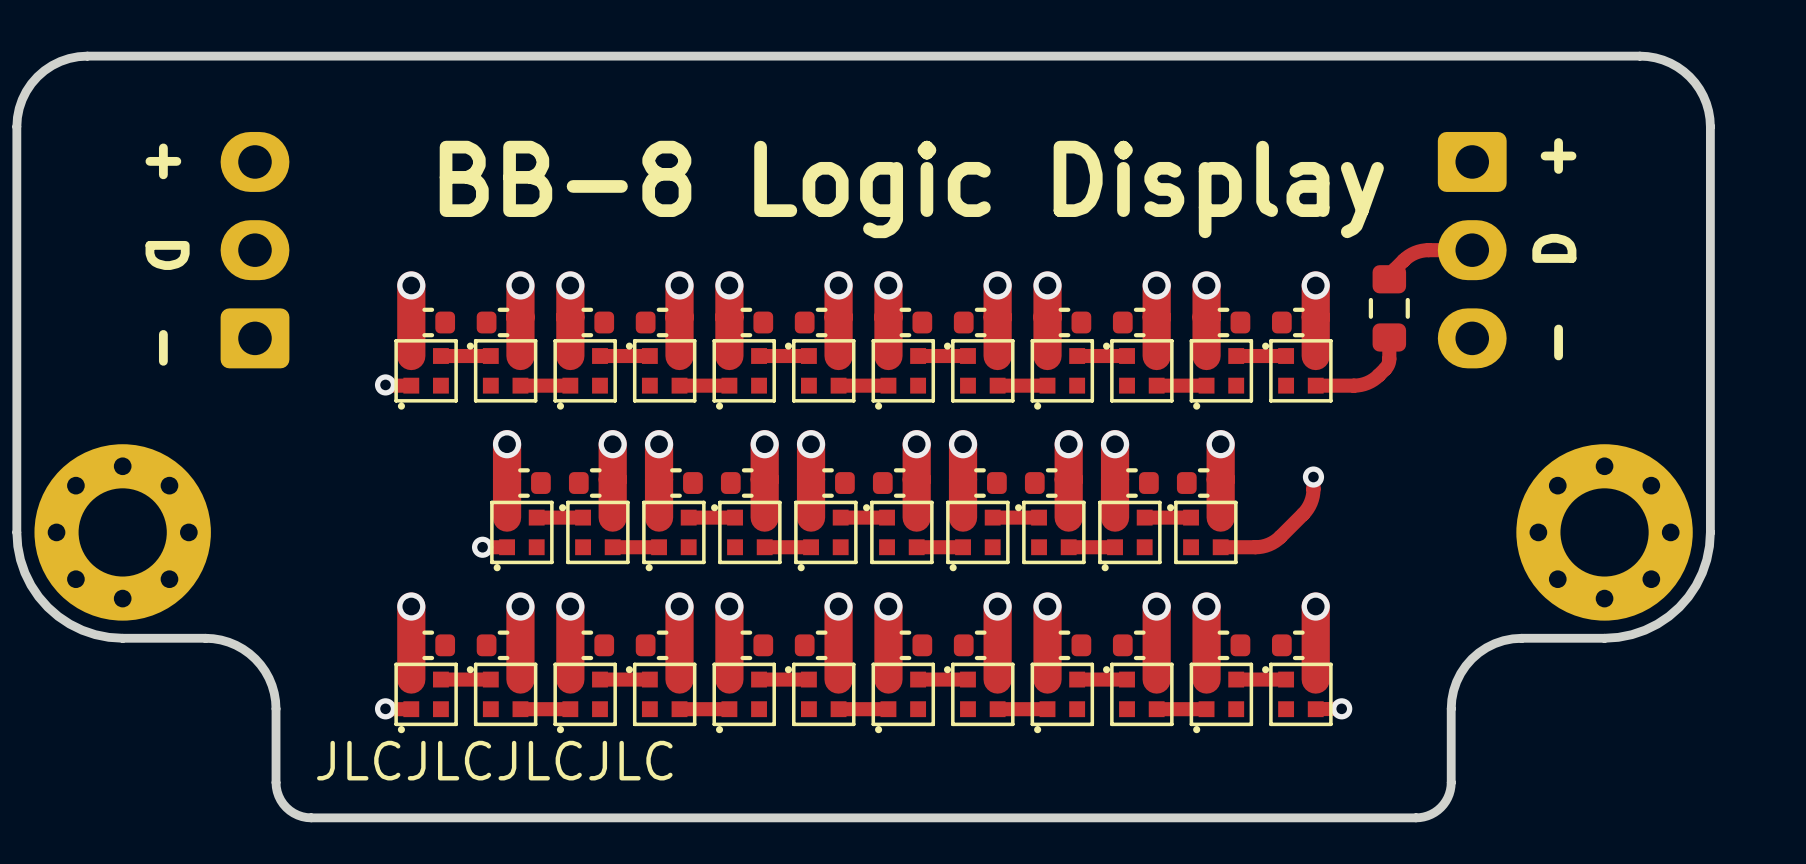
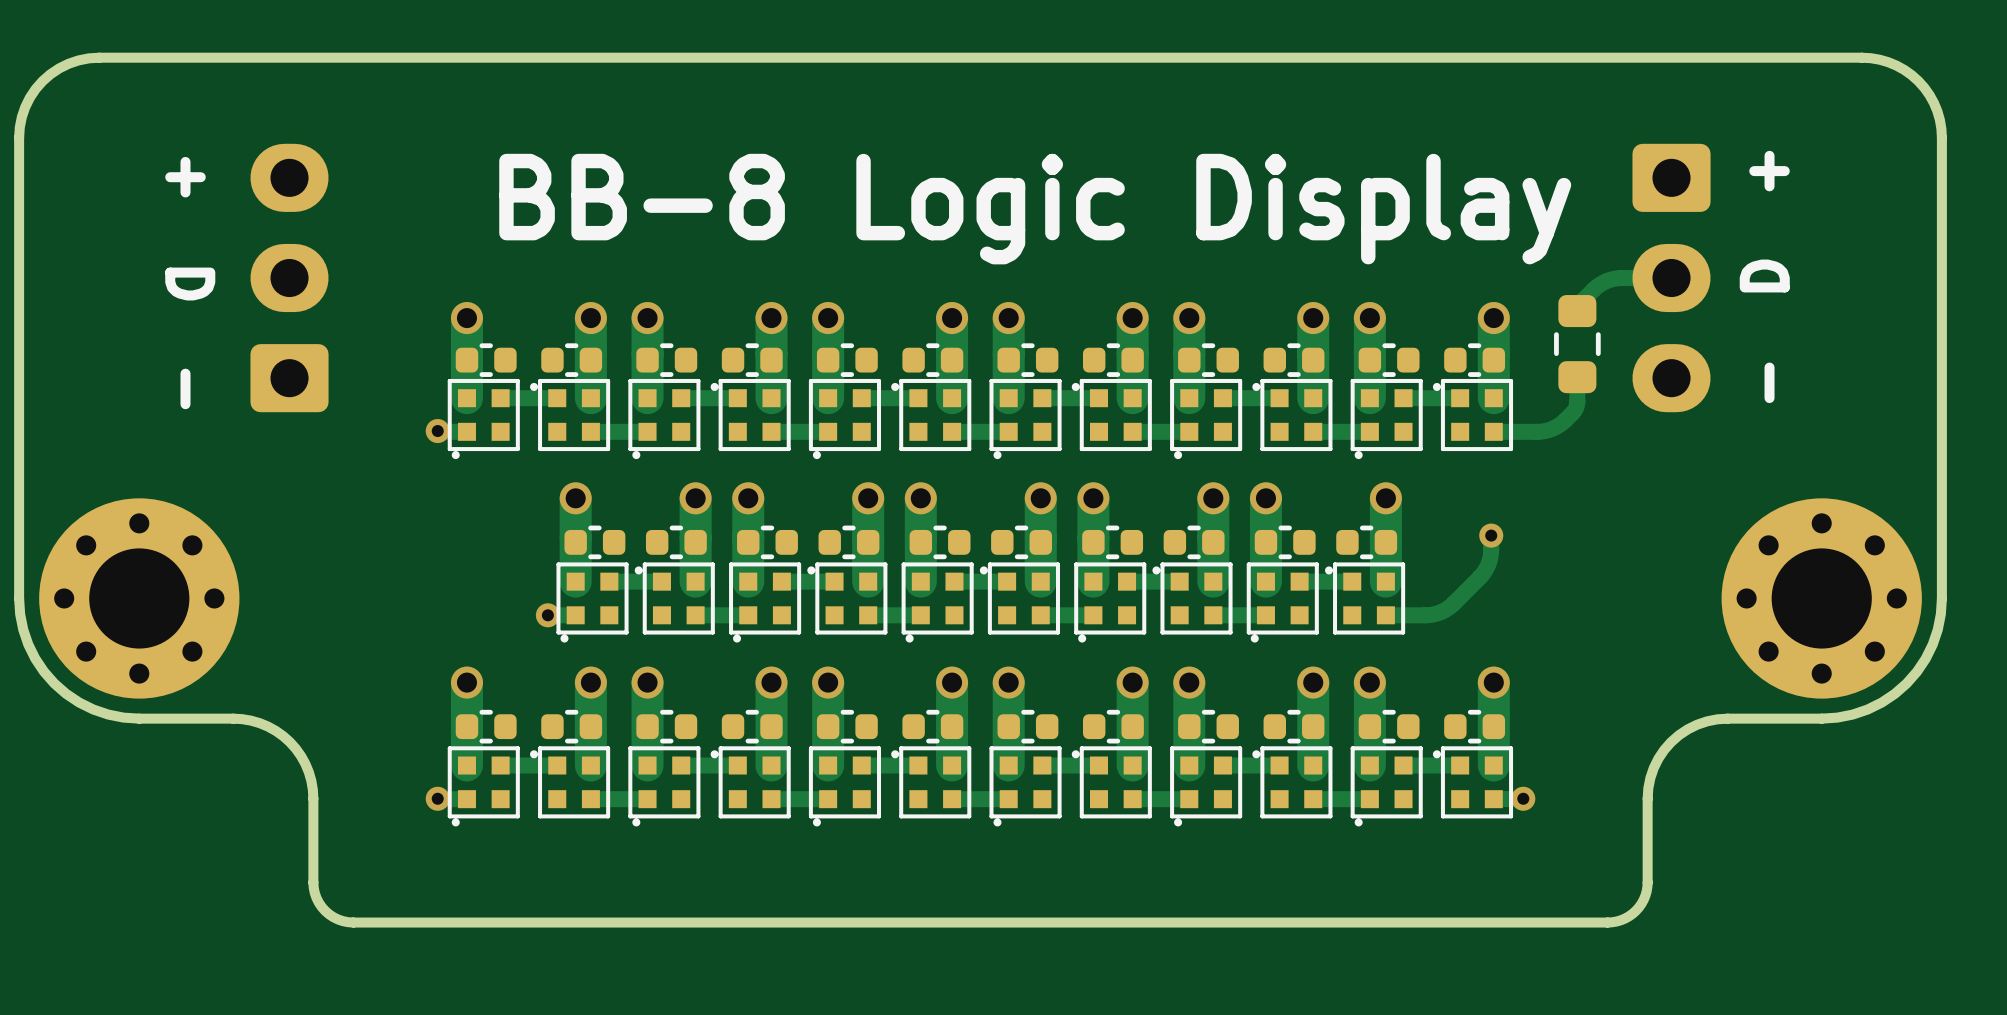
text: JLCJLCJLCJLC (494, 760) -> none

